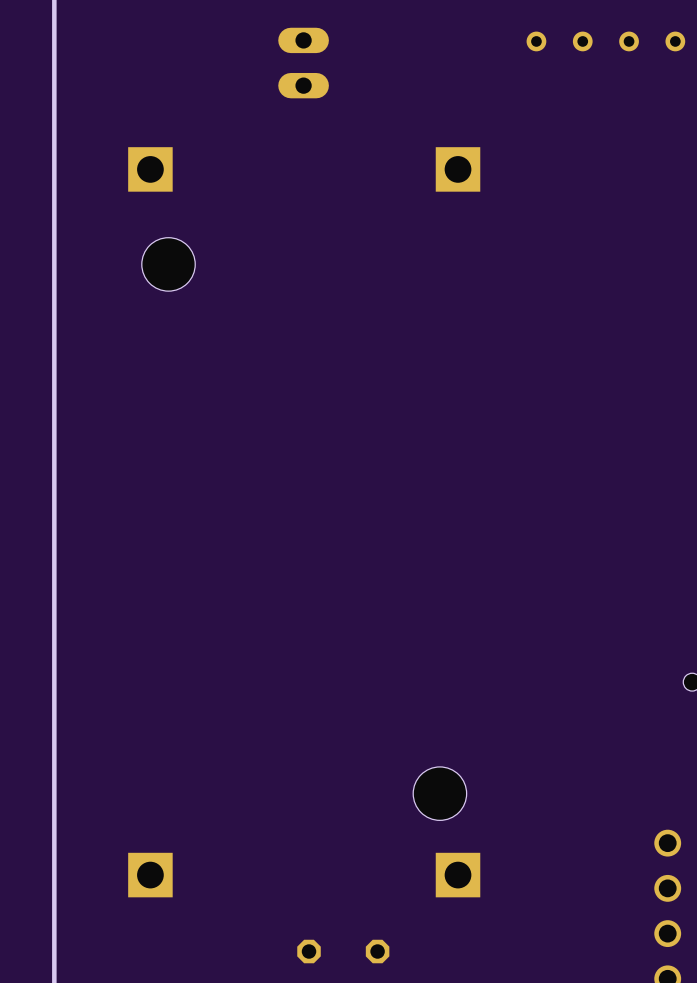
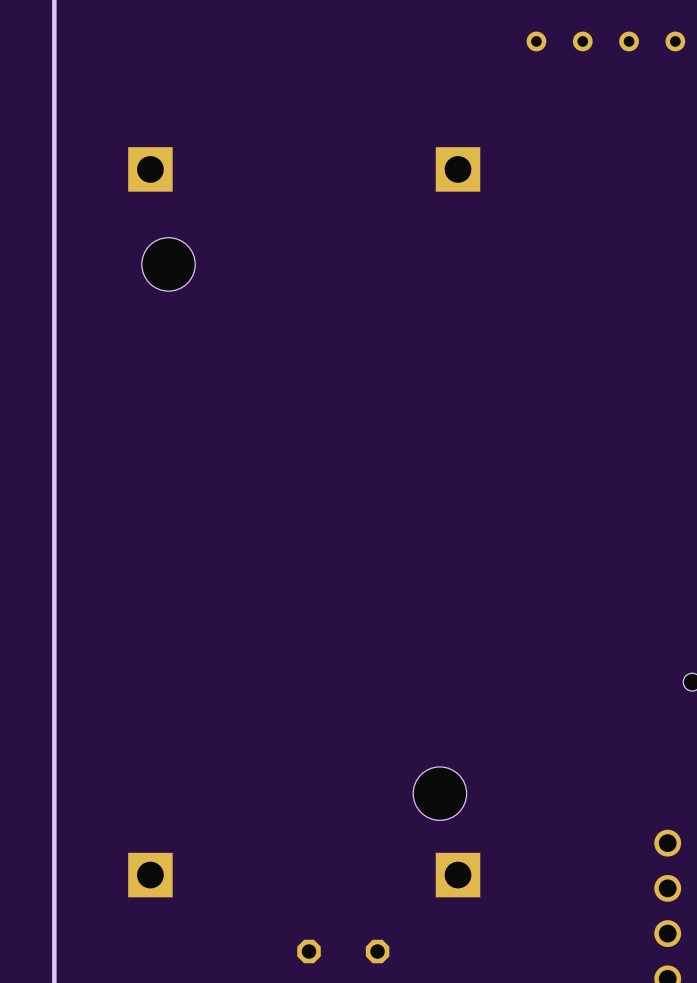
part: (303, 63) -> none

